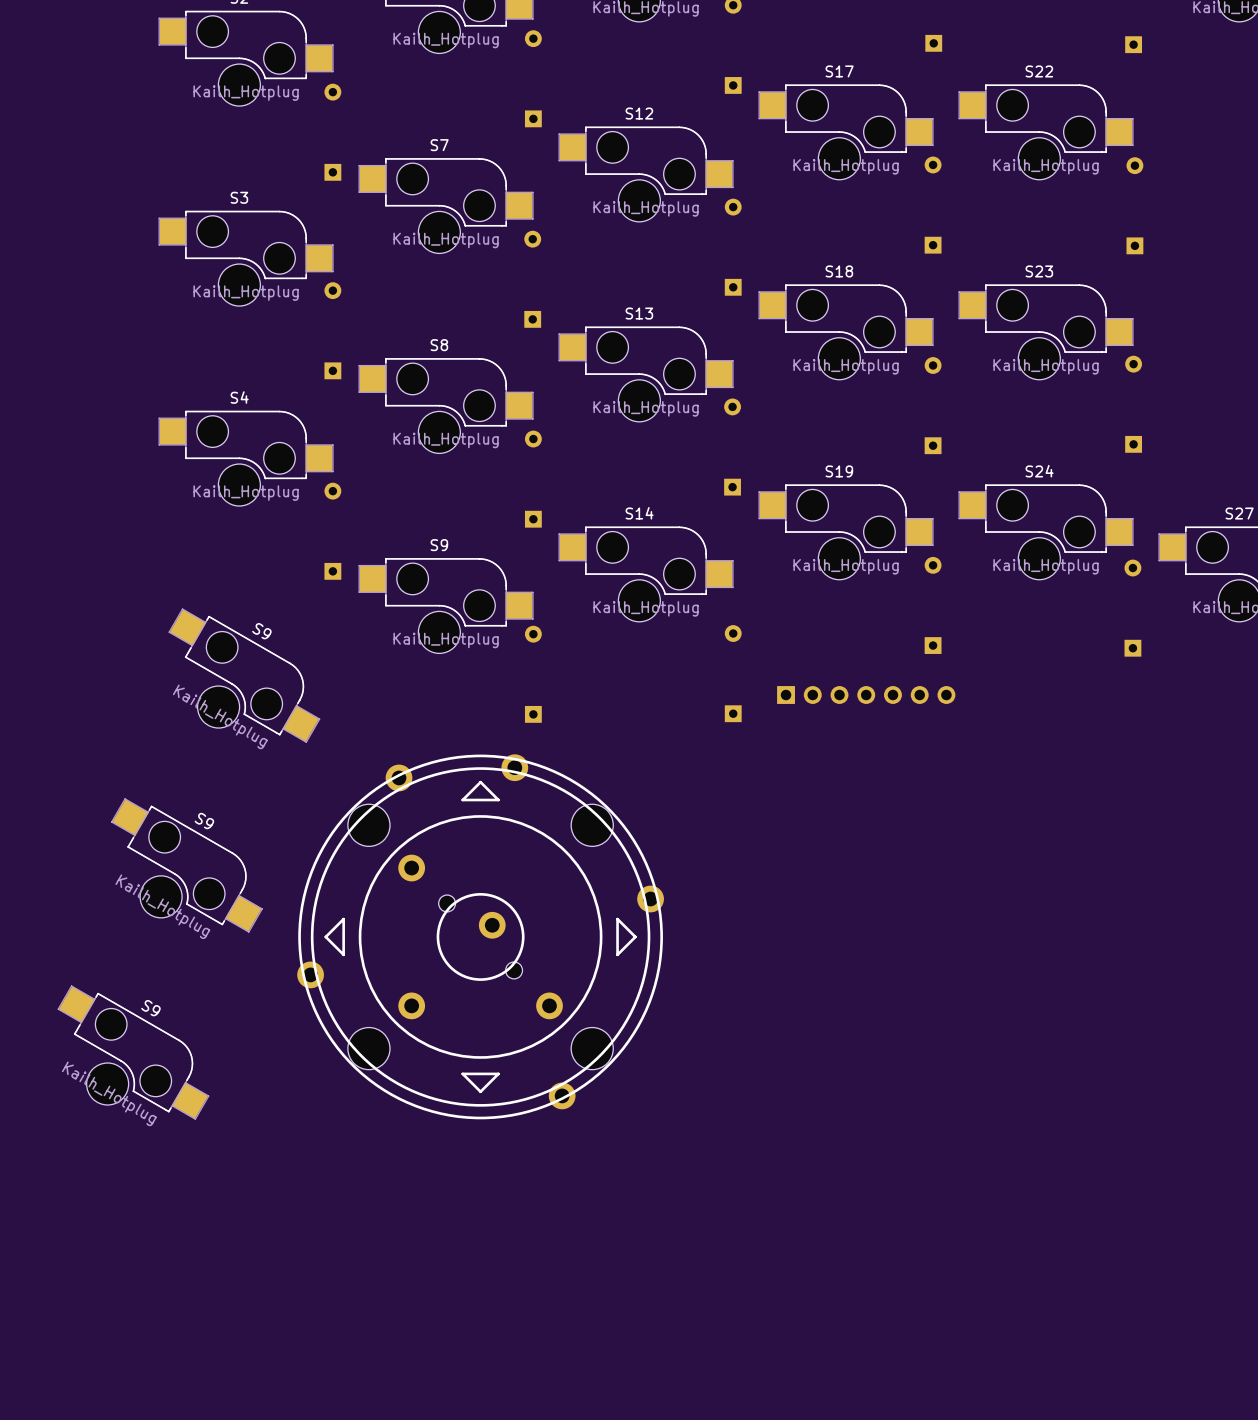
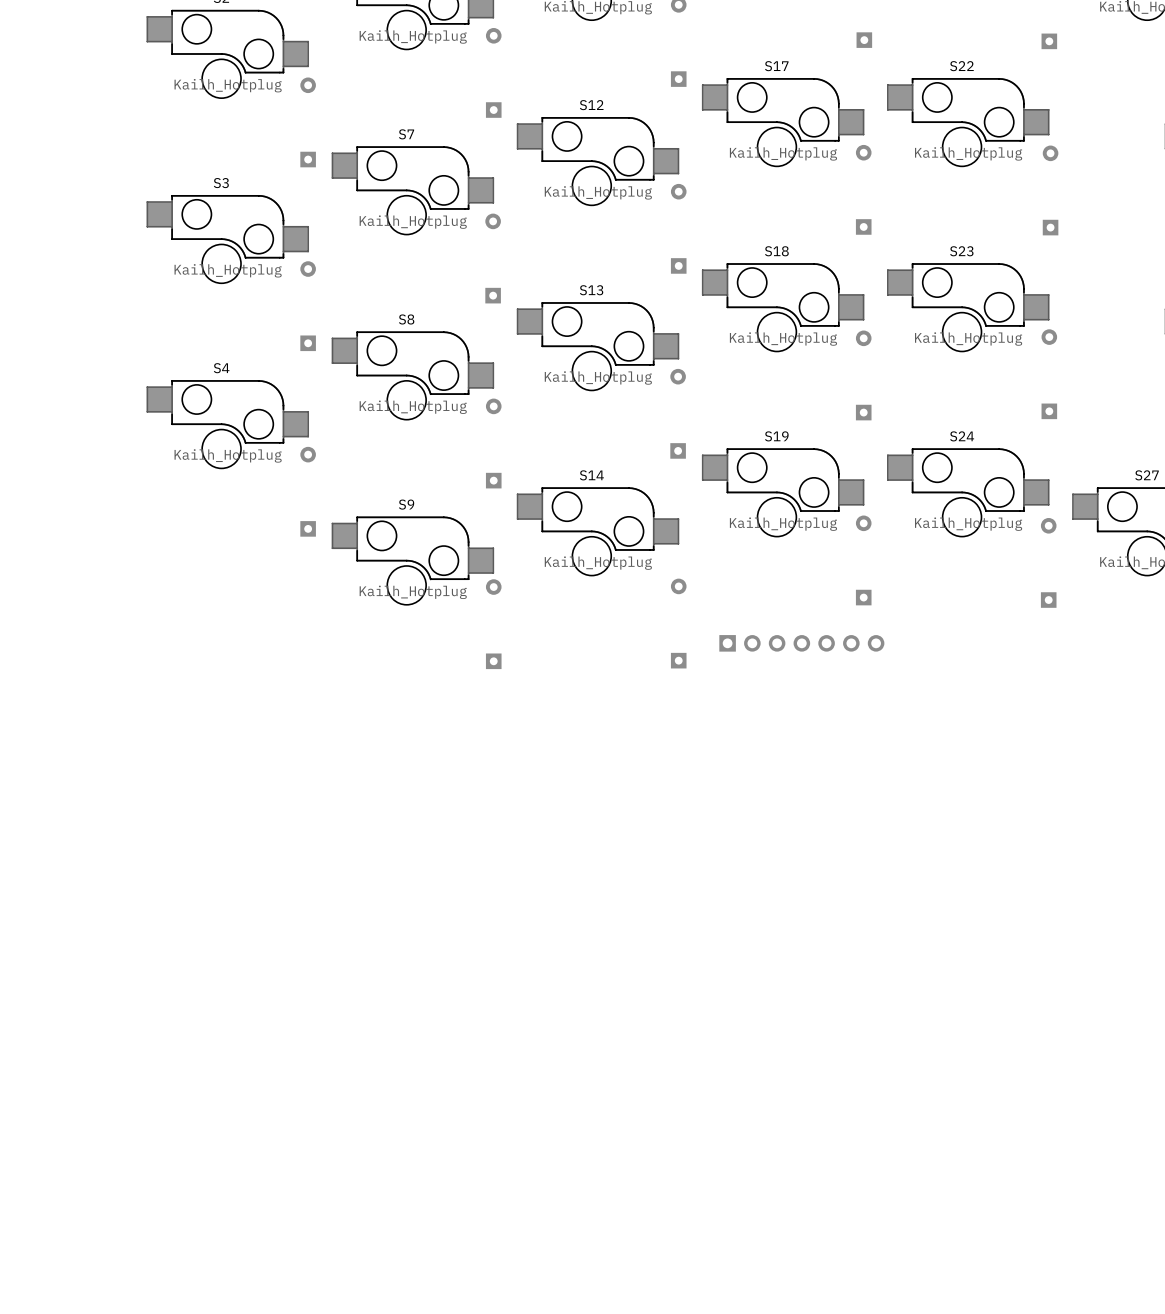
S9: Kailh_Hotplug (244, 675) -> none
S9: Kailh_Hotplug (186, 865) -> none
part: (480, 936) -> none
S9: Kailh_Hotplug (133, 1052) -> none

